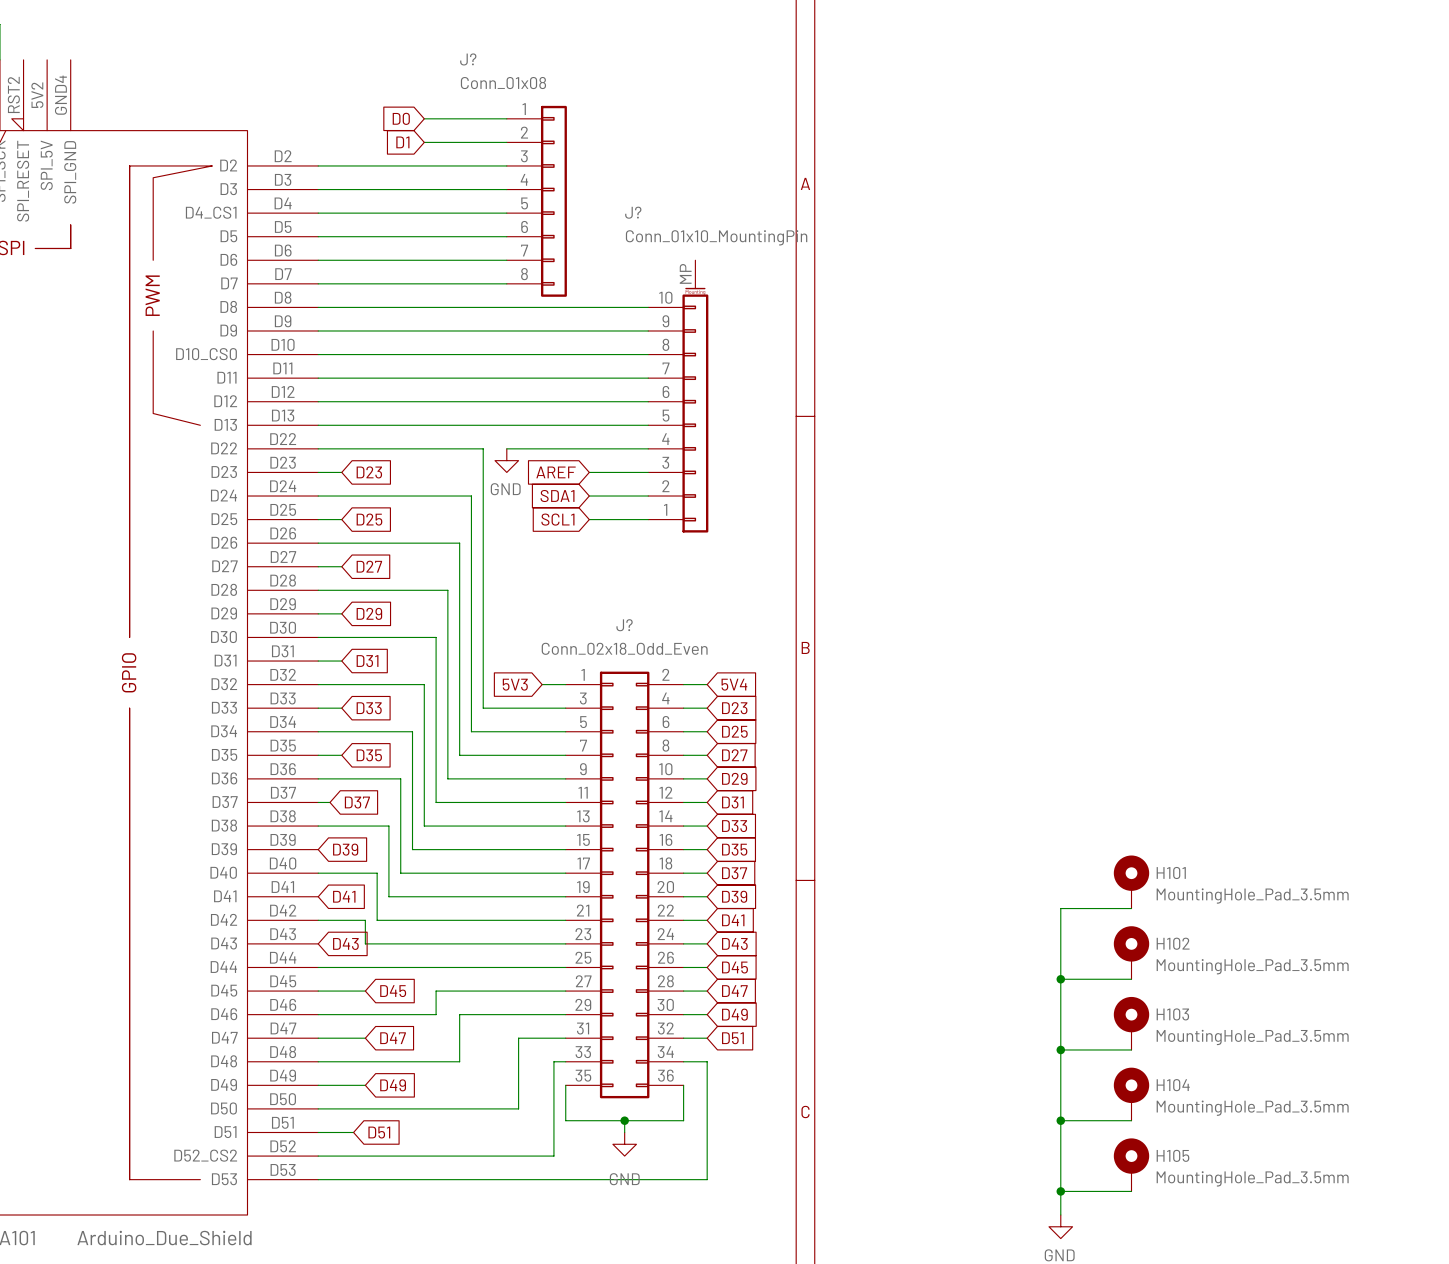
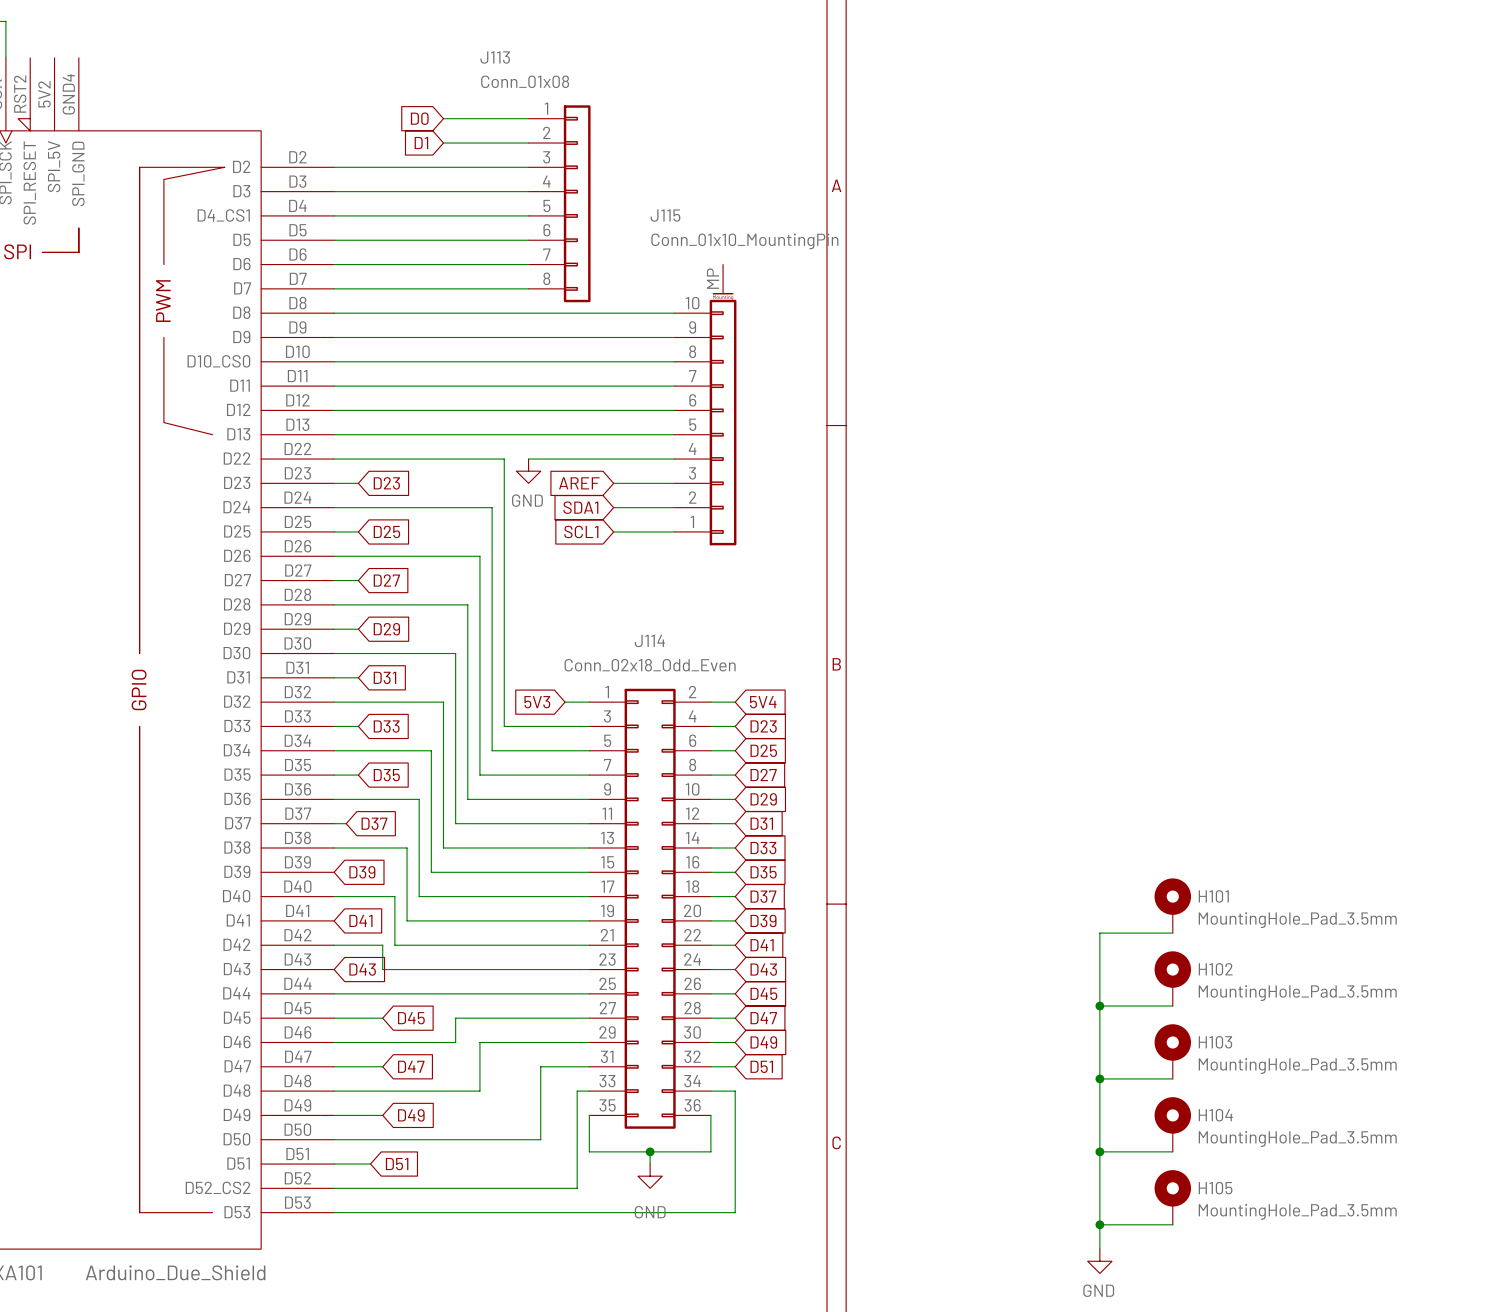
J? name: J? (468, 59) -> J113 (495, 57)
J? name: J? (633, 212) -> J115 (665, 215)
J? name: J? (624, 625) -> J114 (649, 640)

